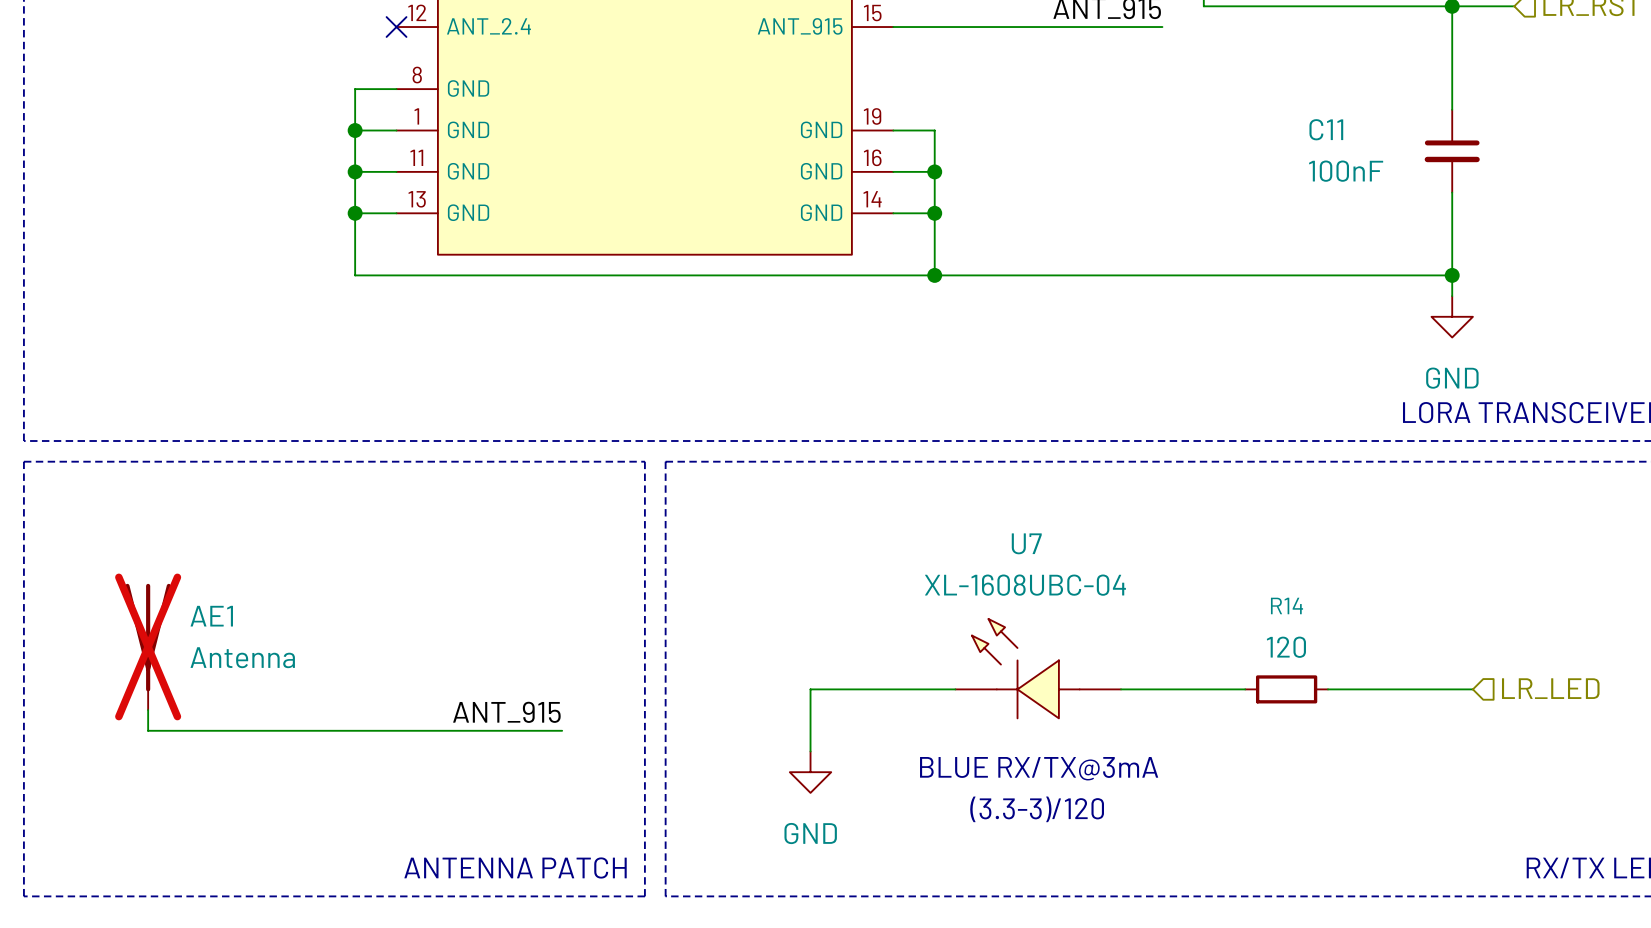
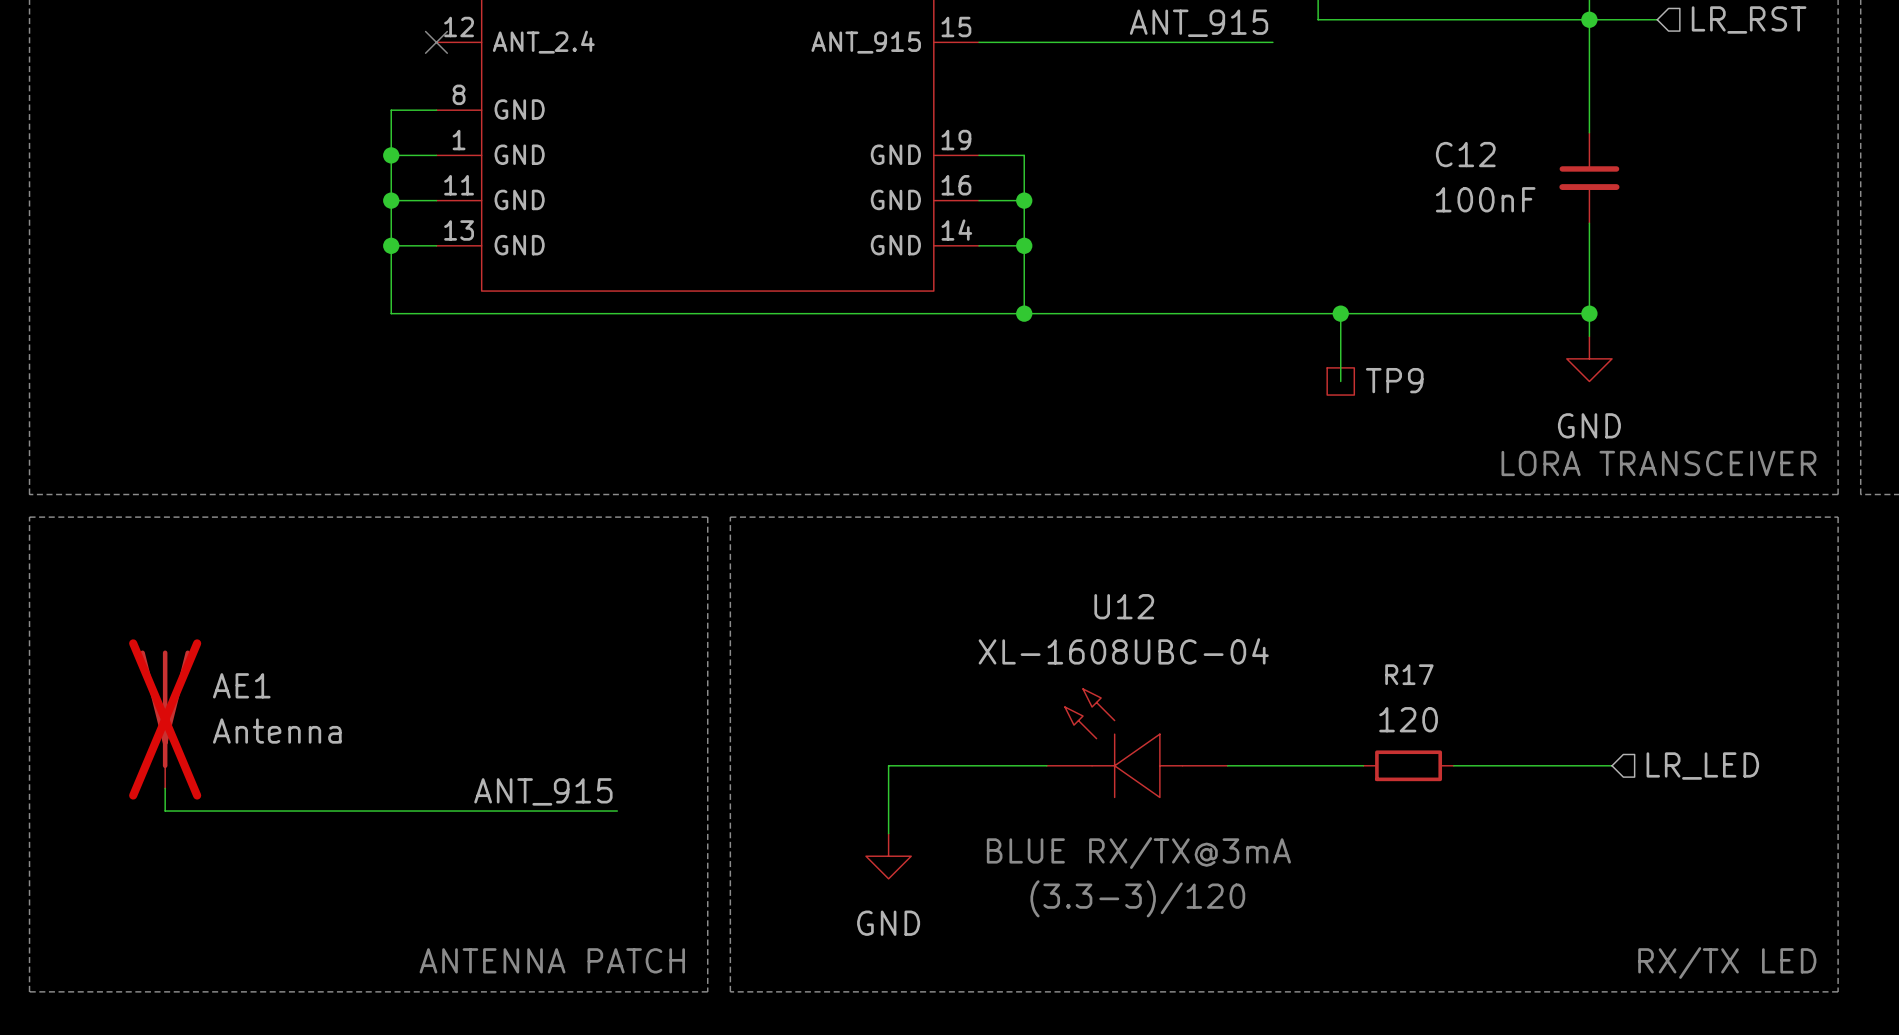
C11 name: C11 (1326, 129) -> C12 (1465, 154)
wire: none -> (1340, 313) (1340, 381)
junction: none -> (1340, 313)
TP9: none -> (1340, 381)
U7 name: U7 (1026, 543) -> U12 (1124, 606)
R14 name: R14 (1287, 605) -> R17 (1409, 674)

